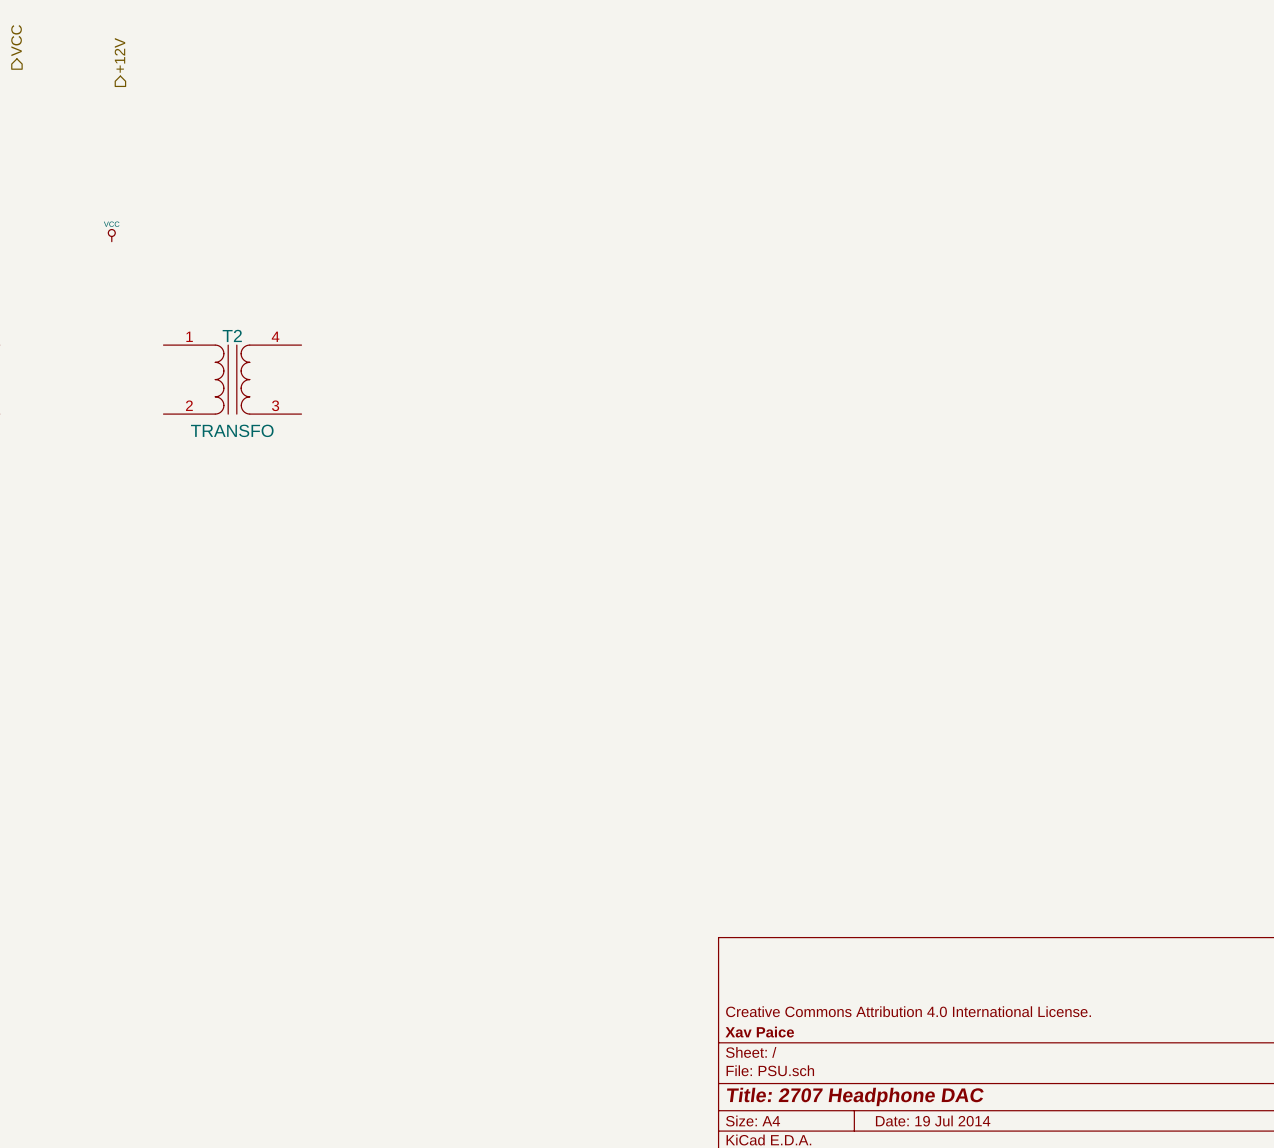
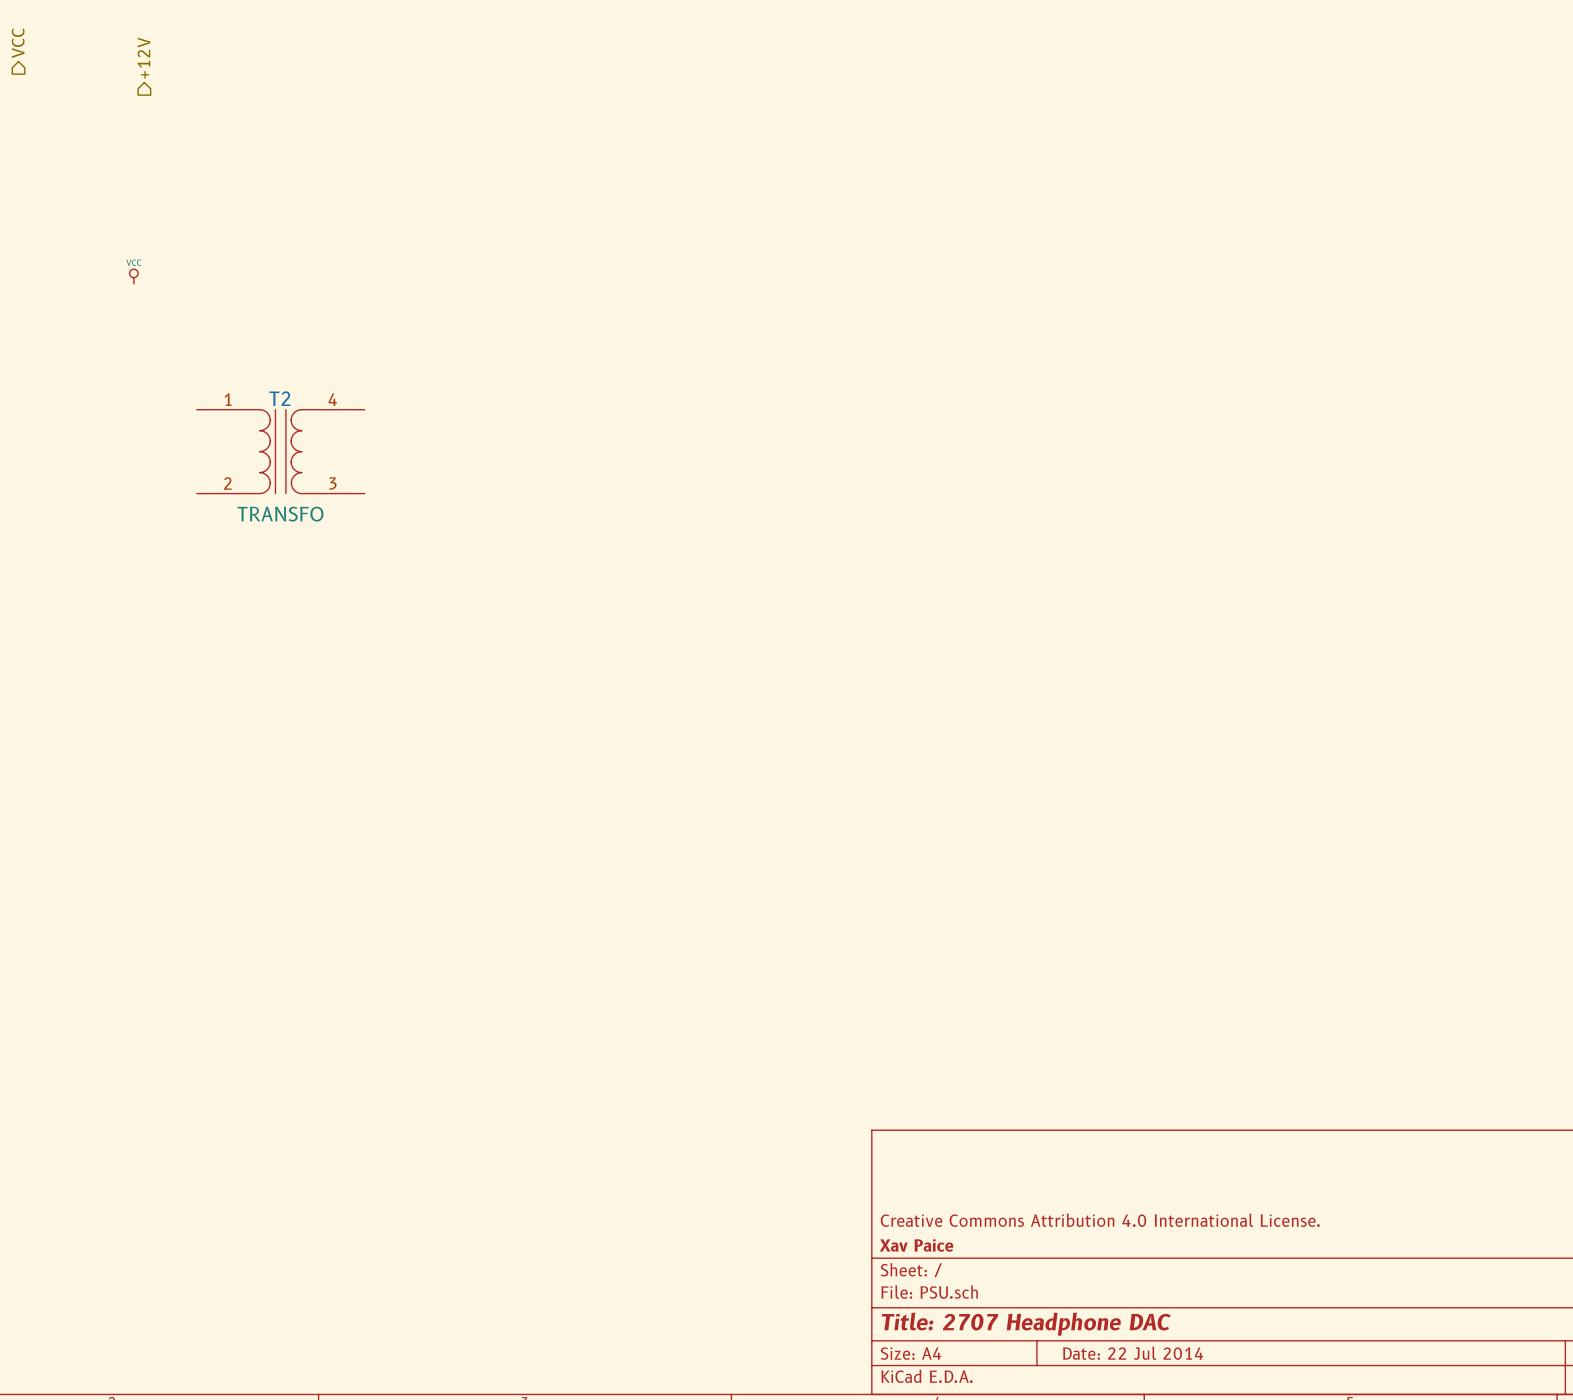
title block: Date: 19 Jul 2014 (933, 1120) -> Date: 22 Jul 2014 (1133, 1353)

